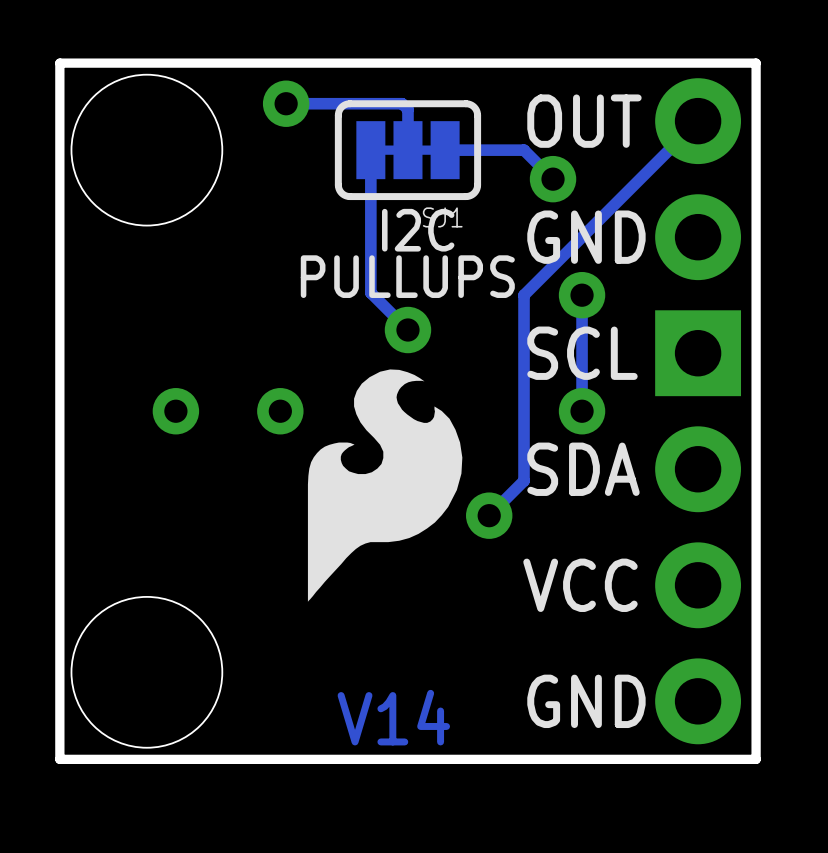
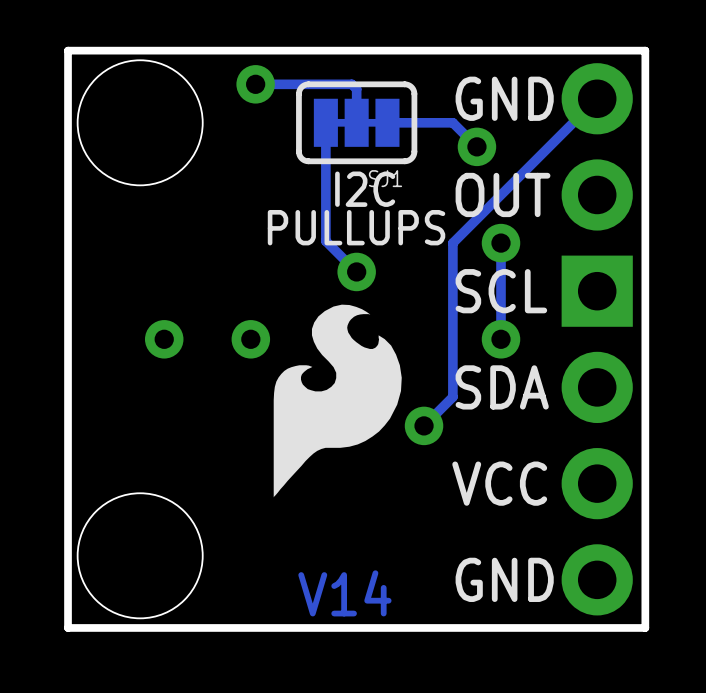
text: OUT (584, 121) -> GND (504, 98)
text: GND (586, 237) -> OUT (503, 194)

